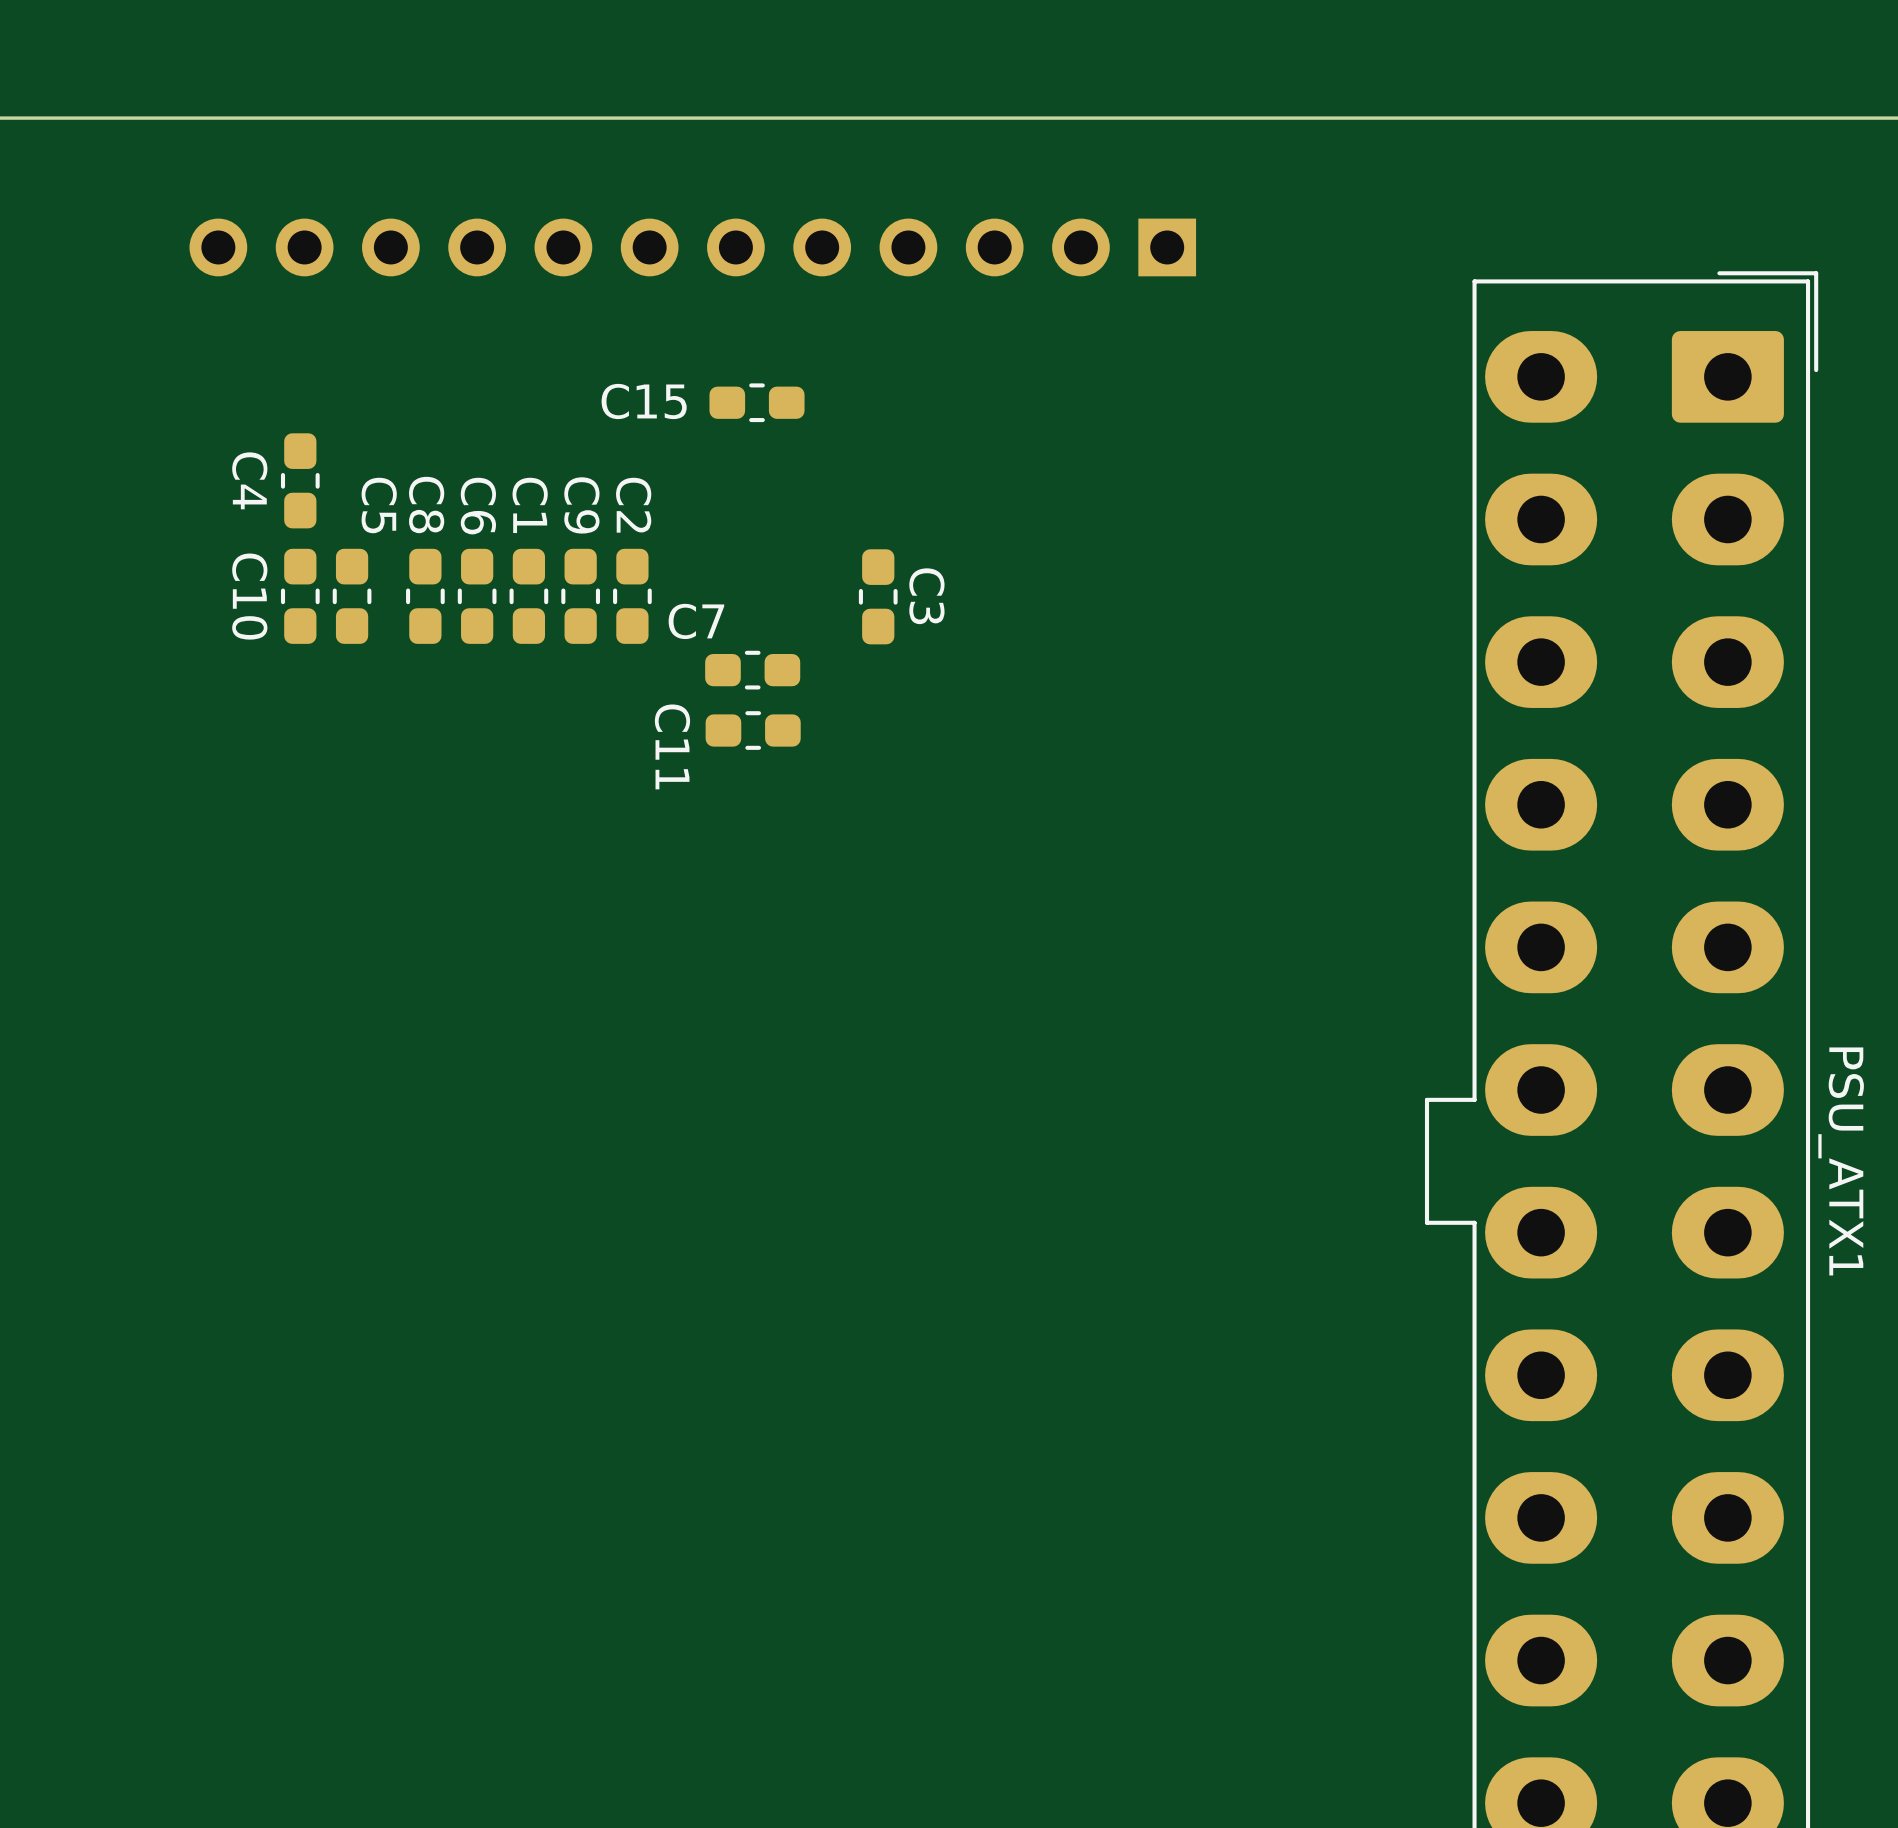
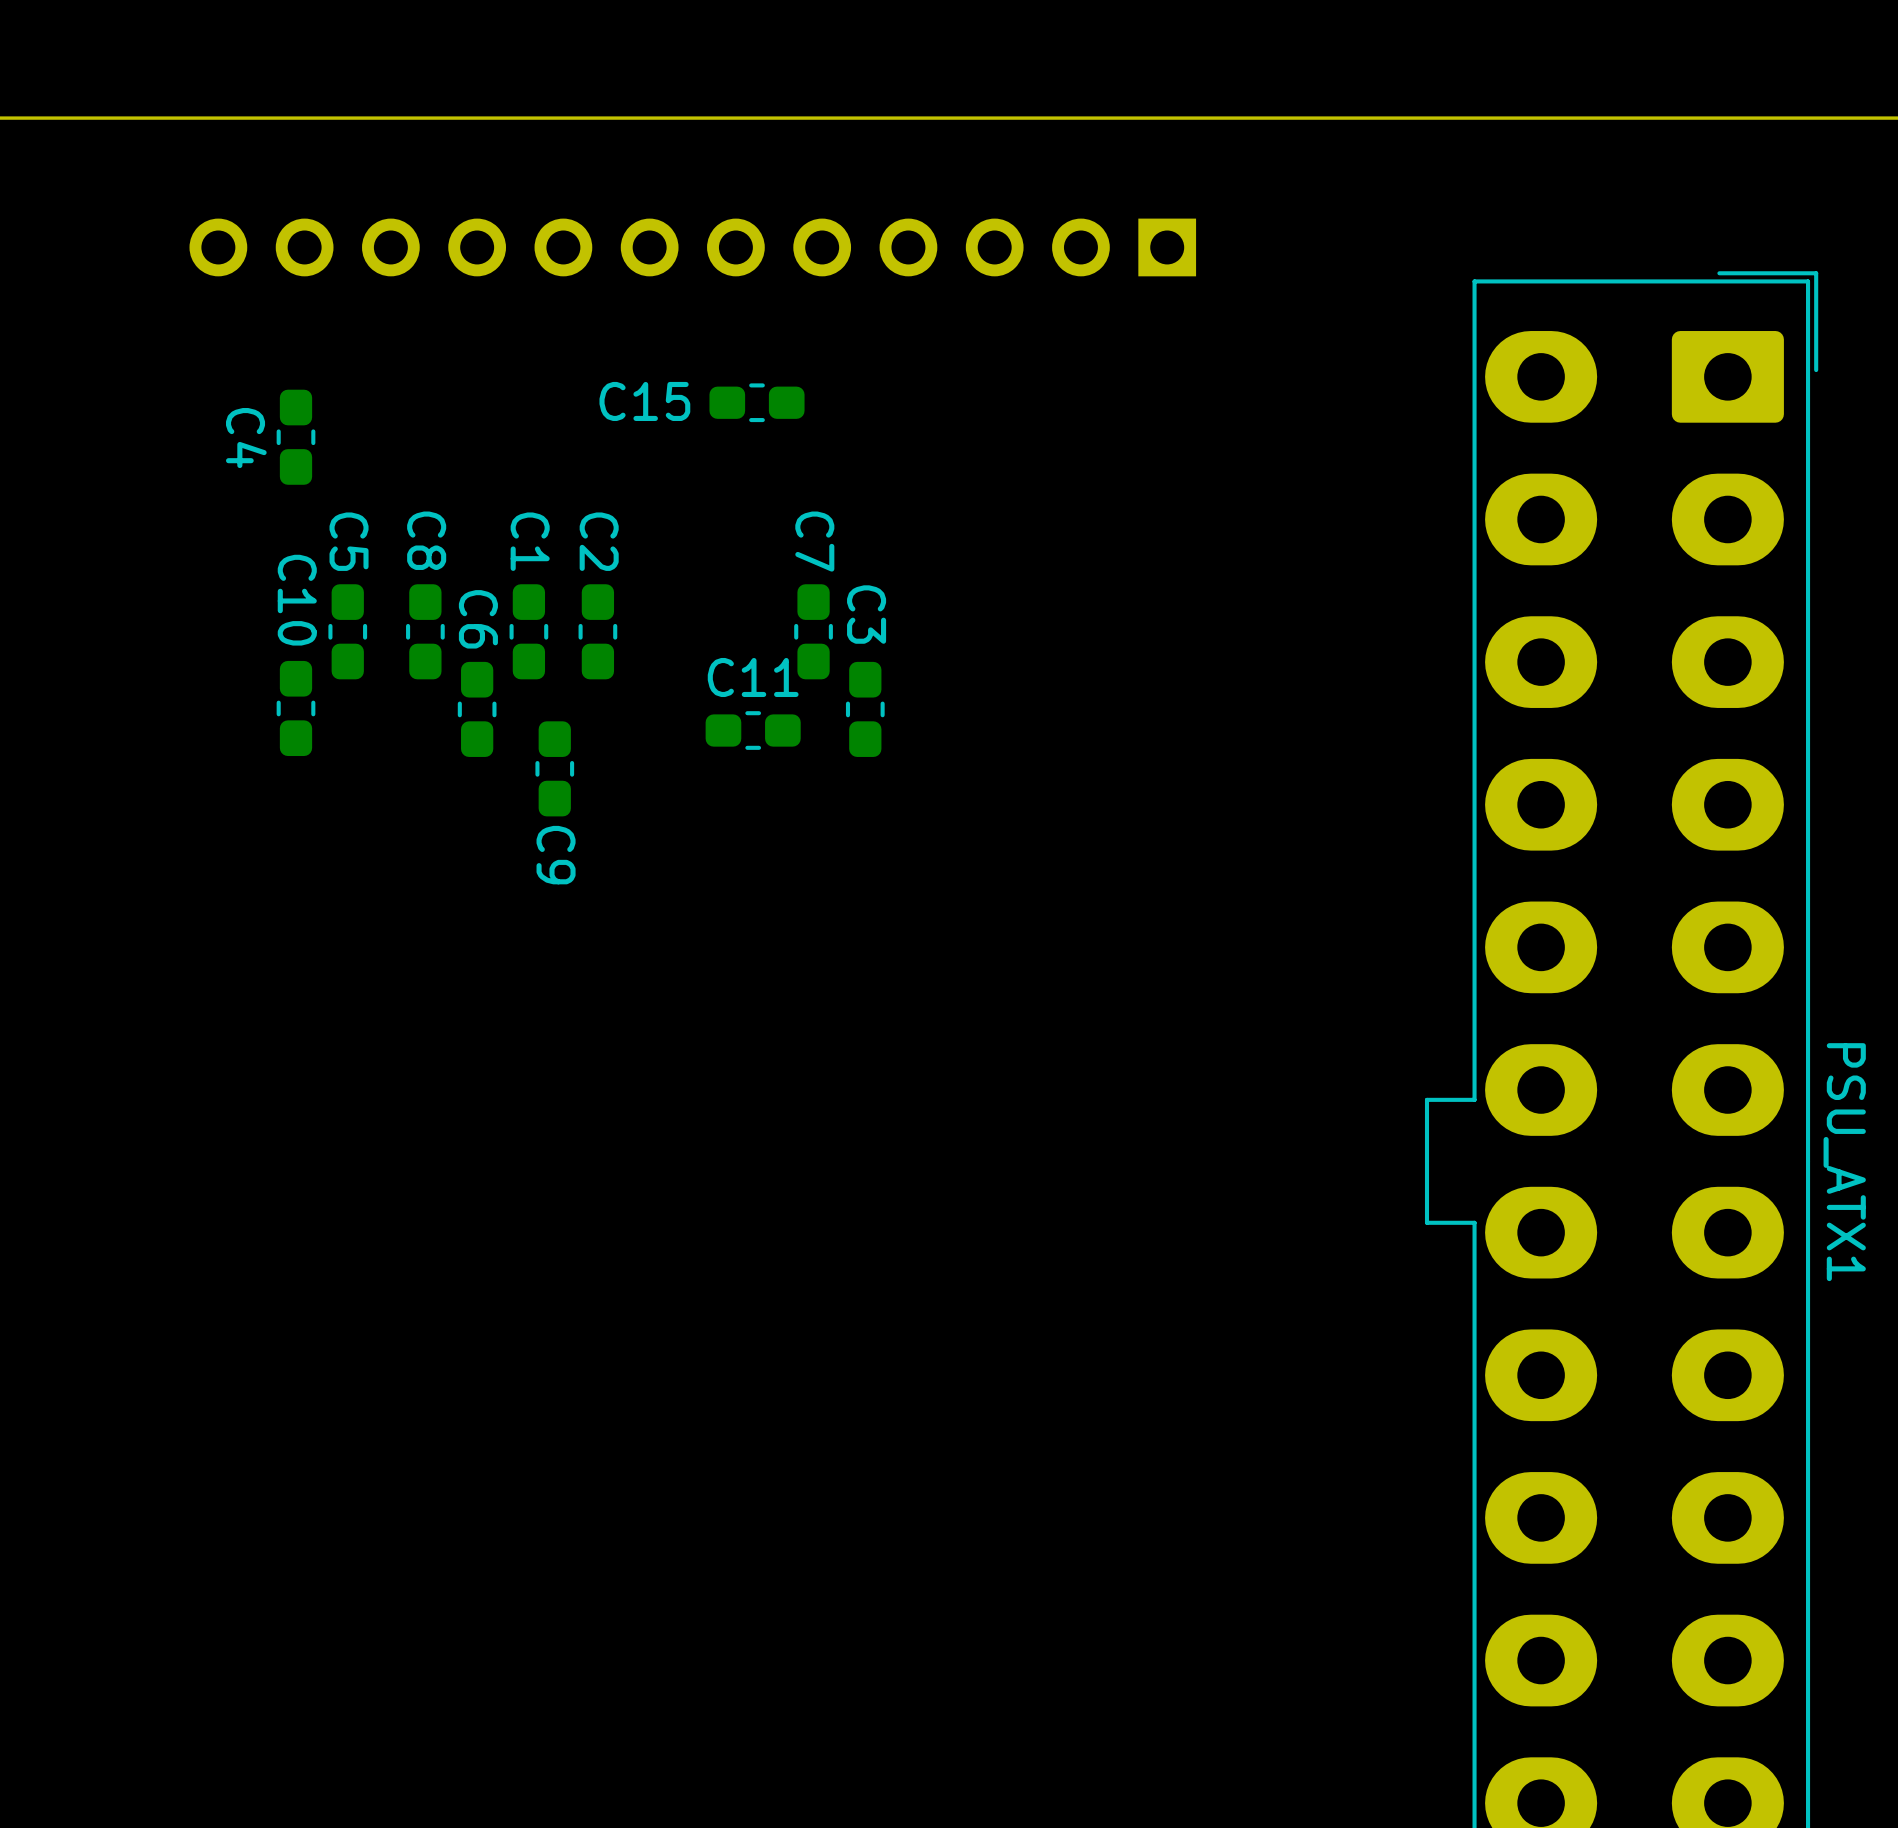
C4 position: (300, 480) -> (296, 437)
C5 name position: C5 (379, 505) -> C5 (349, 541)
C9 name position: C9 (581, 505) -> C9 (556, 855)
C10 name position: C10 (249, 596) -> C10 (297, 600)
C10 position: (300, 596) -> (296, 708)
C5 position: (352, 596) -> (347, 631)
C8 position: (425, 596) -> (425, 631)
C6 position: (477, 596) -> (477, 709)
C1 position: (528, 596) -> (528, 631)
C9 position: (580, 596) -> (554, 768)
C2 position: (632, 596) -> (597, 631)
C3 position: (878, 596) -> (865, 709)
C3 name position: C3 (926, 596) -> C3 (866, 614)
C7 rotation: 0° (752, 670) -> 90° clockwise (813, 631)
C7 position: (752, 670) -> (813, 631)
C11 name rotation: 0° (672, 746) -> 90° counterclockwise (753, 677)

